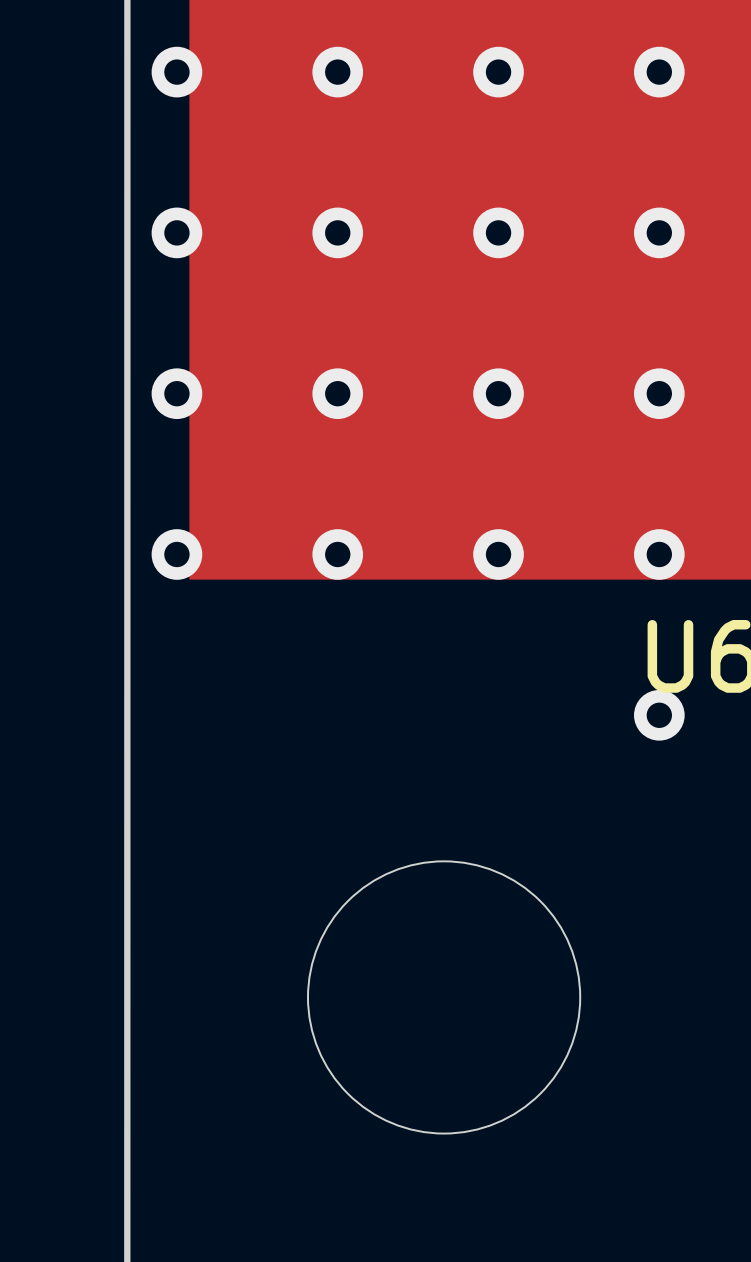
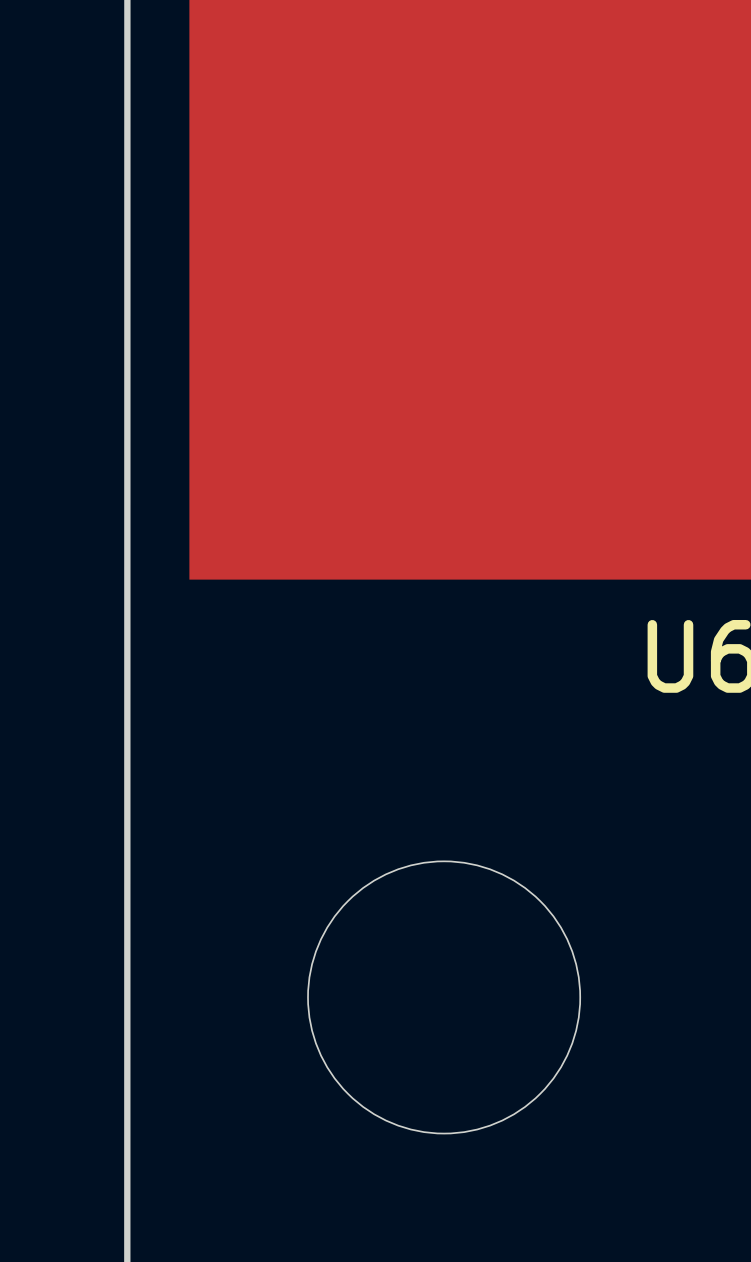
via: (176, 72) -> none
via: (337, 72) -> none
via: (498, 72) -> none
via: (659, 72) -> none
via: (176, 232) -> none
via: (337, 232) -> none
via: (498, 232) -> none
via: (659, 232) -> none
via: (176, 393) -> none
via: (337, 393) -> none
via: (498, 393) -> none
via: (659, 393) -> none
via: (176, 554) -> none
via: (337, 554) -> none
via: (498, 554) -> none
via: (659, 554) -> none
via: (659, 715) -> none

